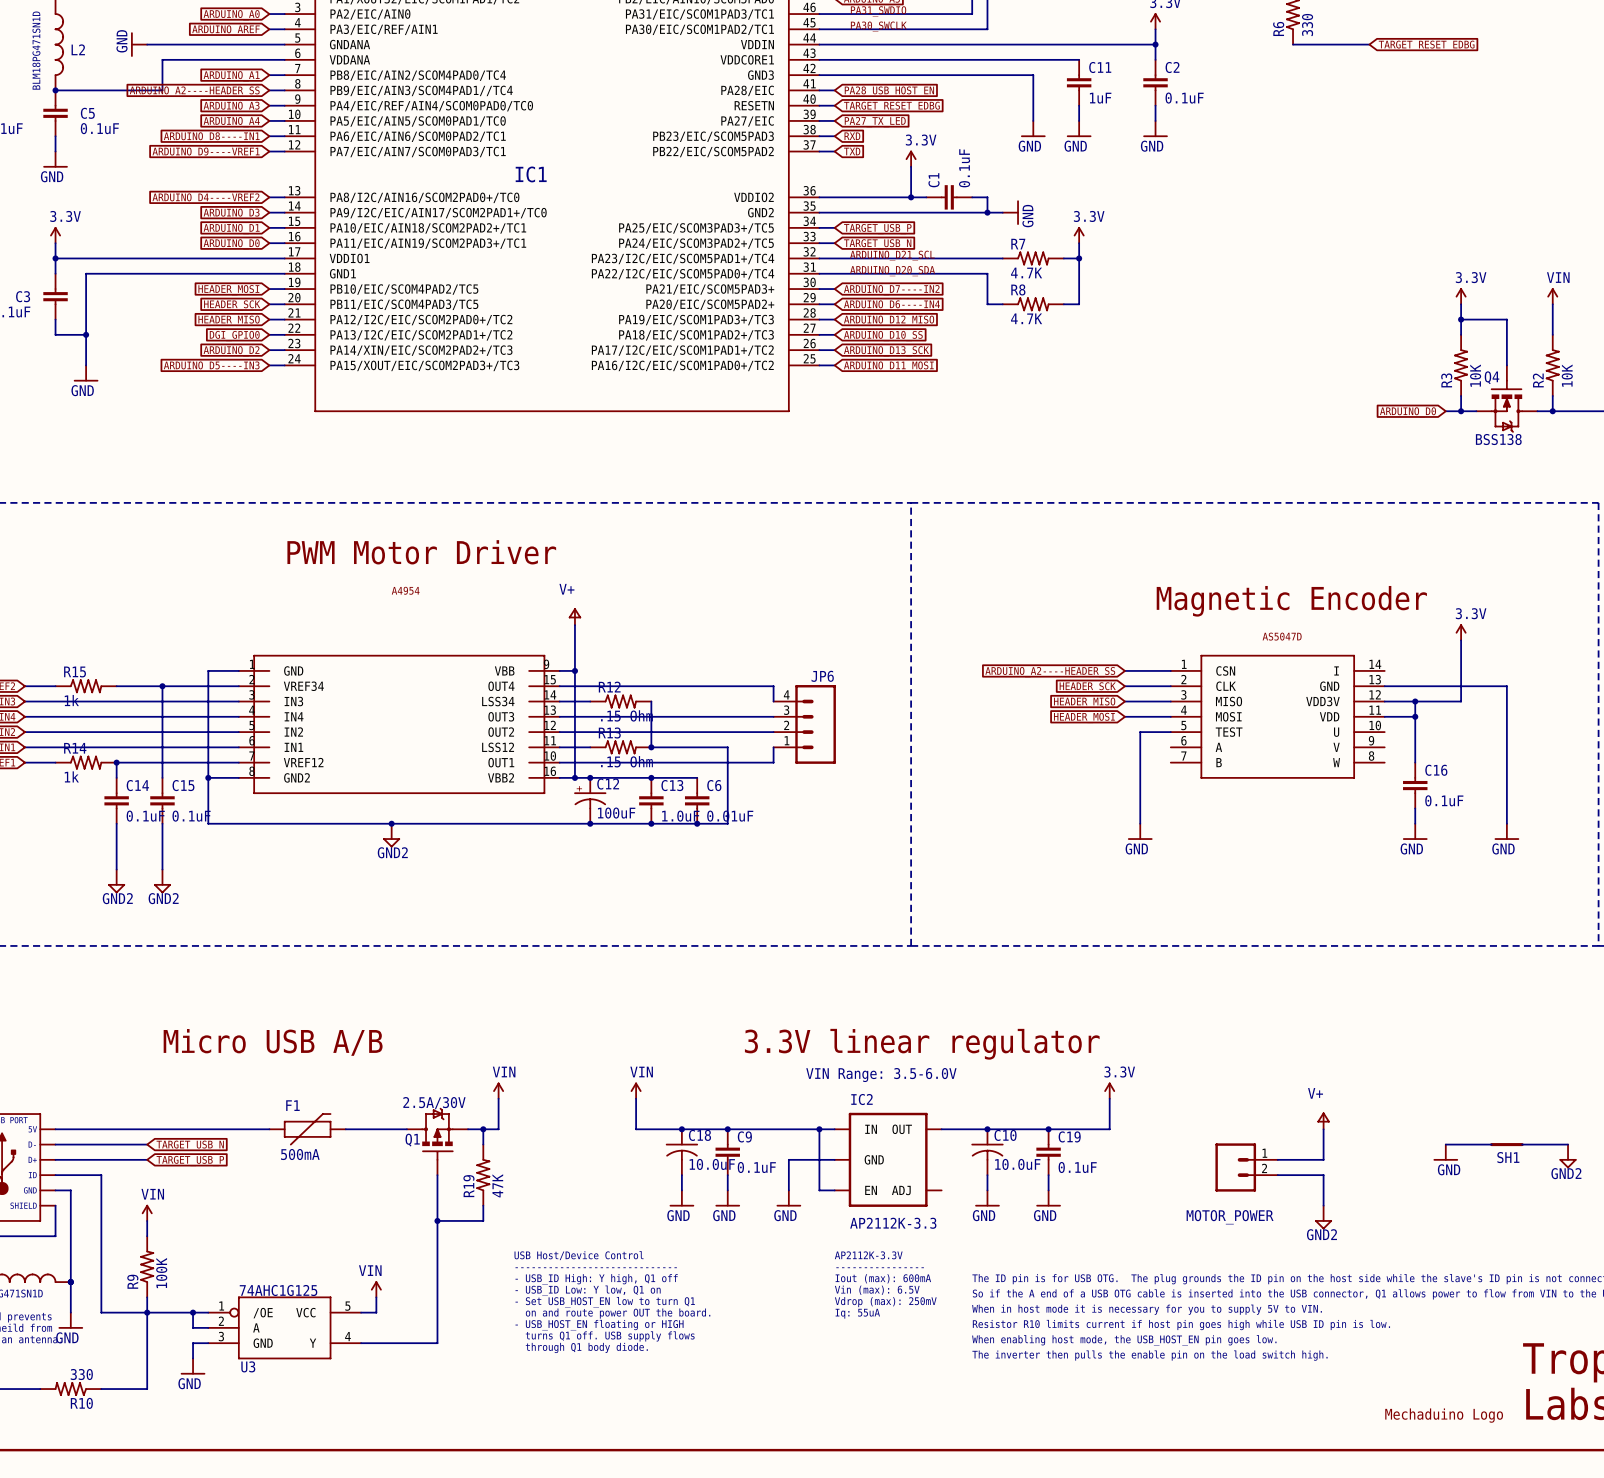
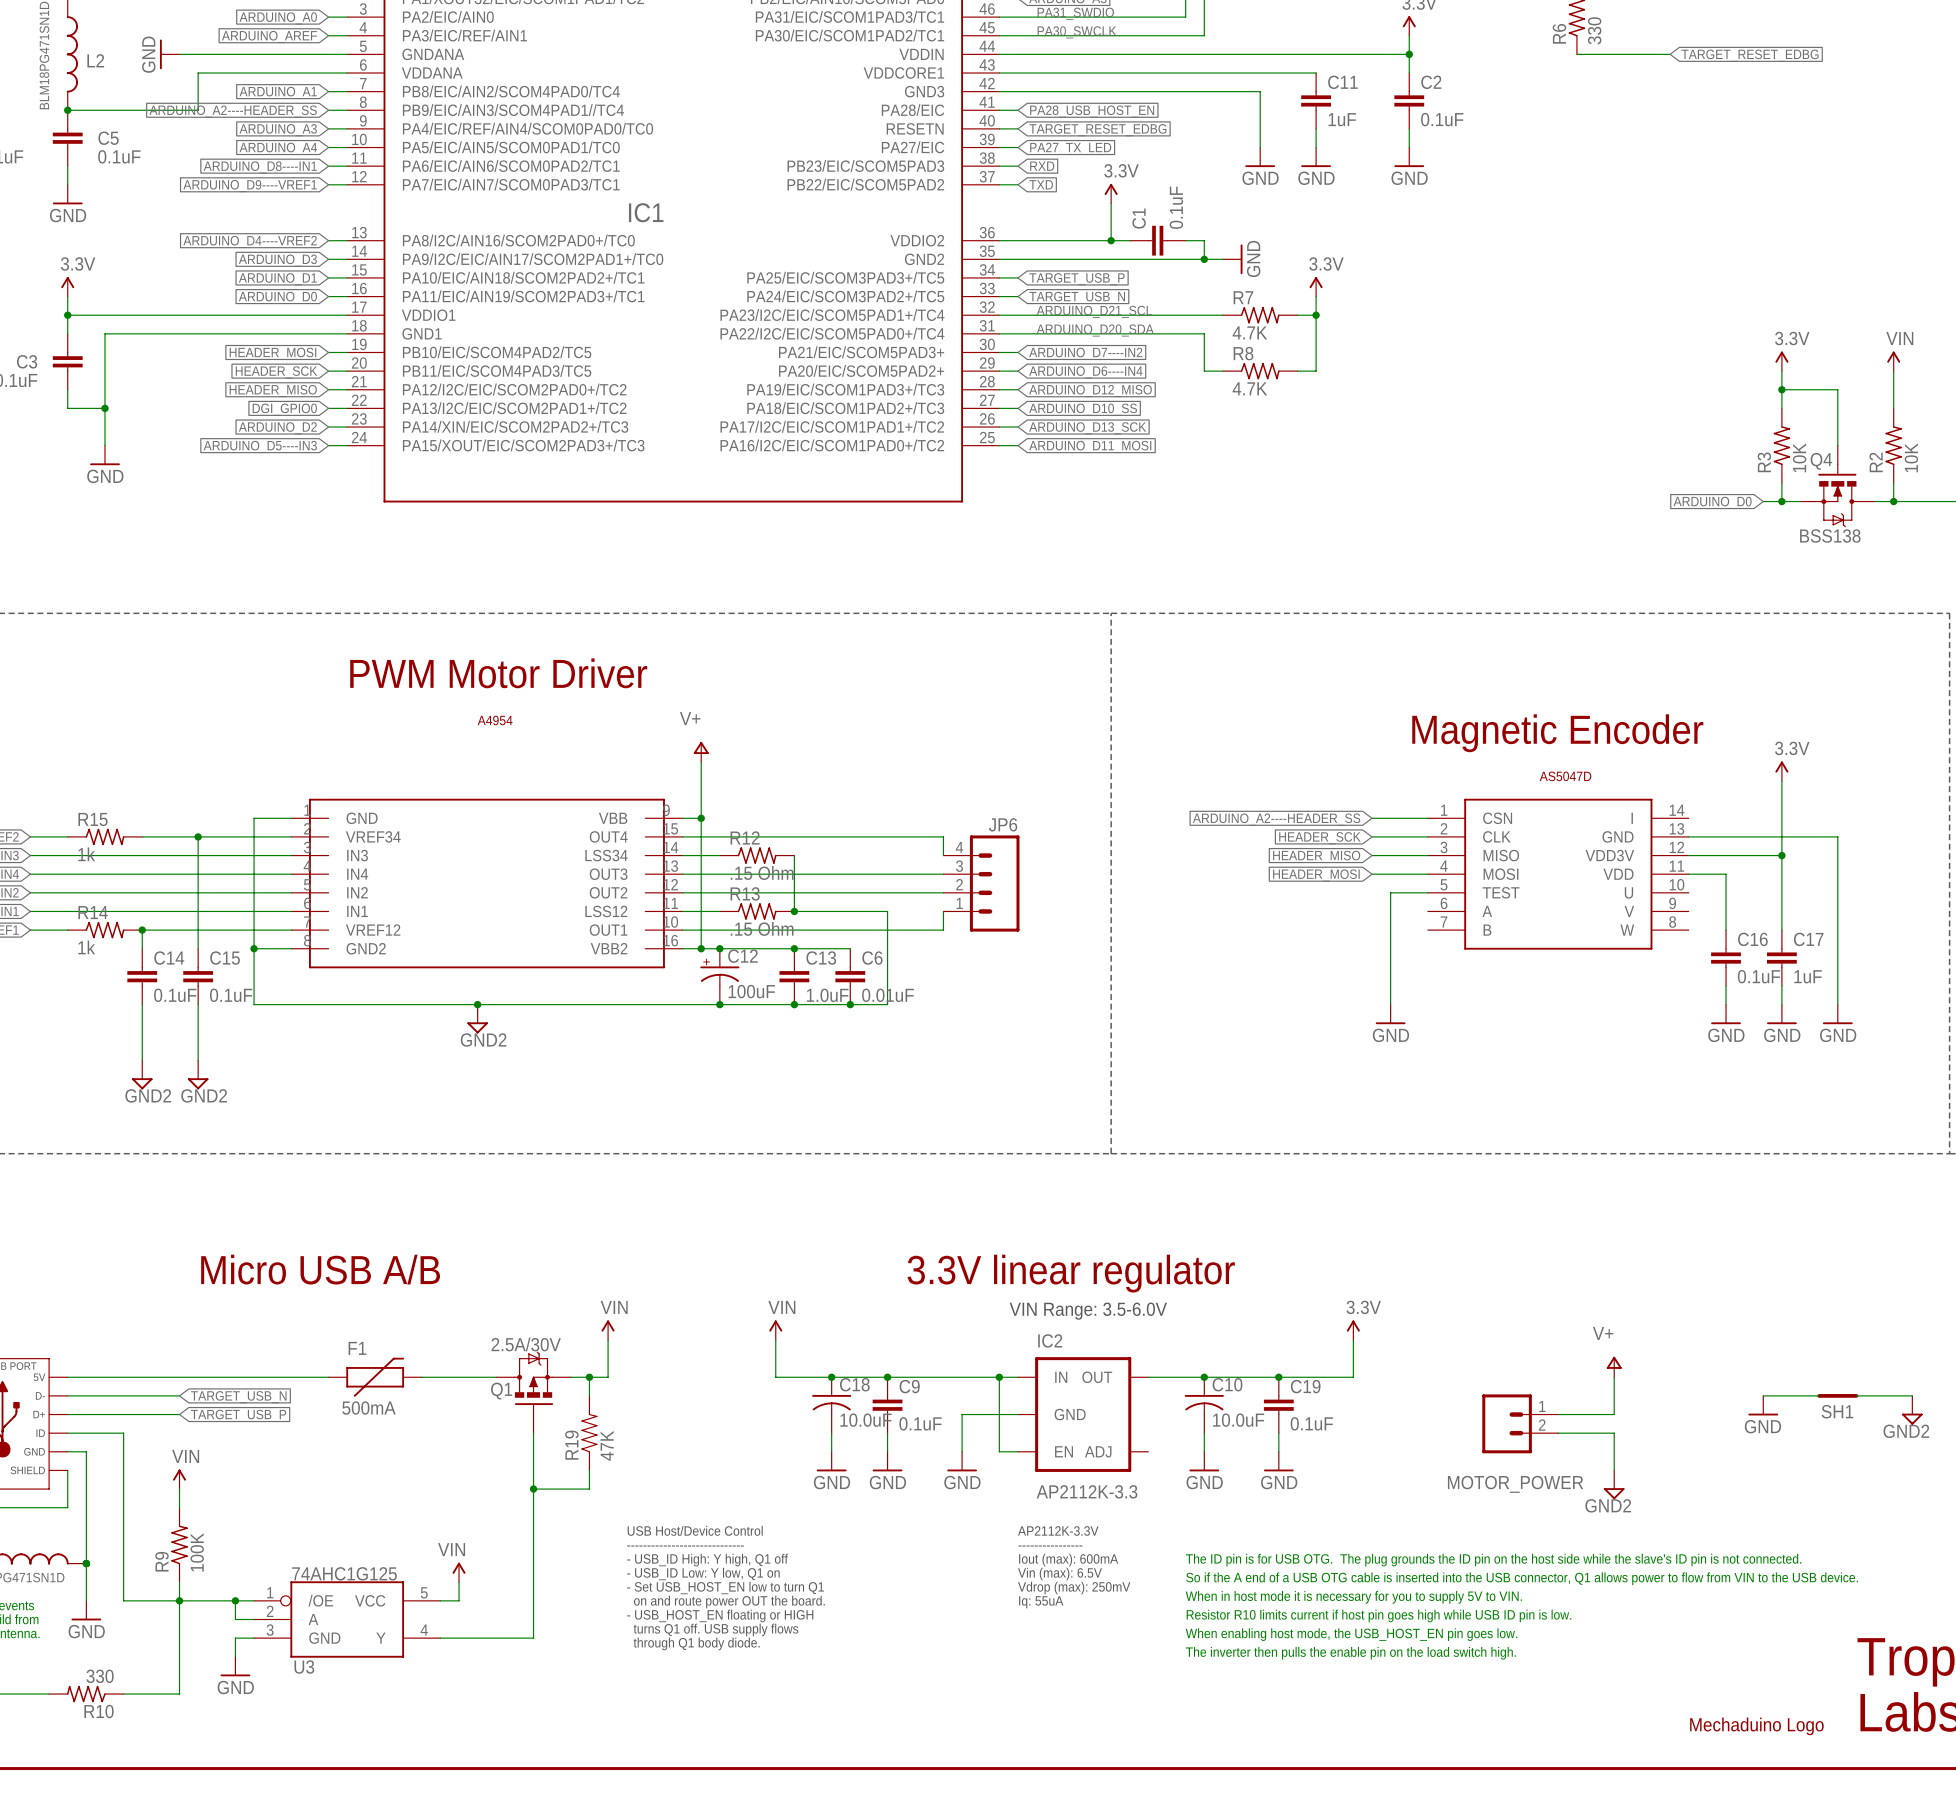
wire: (1415, 701) (1415, 716) -> (1781, 985) (1781, 1004)
junction: (1415, 701) -> none
wire: none -> (1781, 855) (1781, 930)
junction: none -> (1781, 855)
junction: (1415, 716) -> none
C17: none -> 1uF (1781, 958)
power symbol: none -> GND (1781, 1014)

